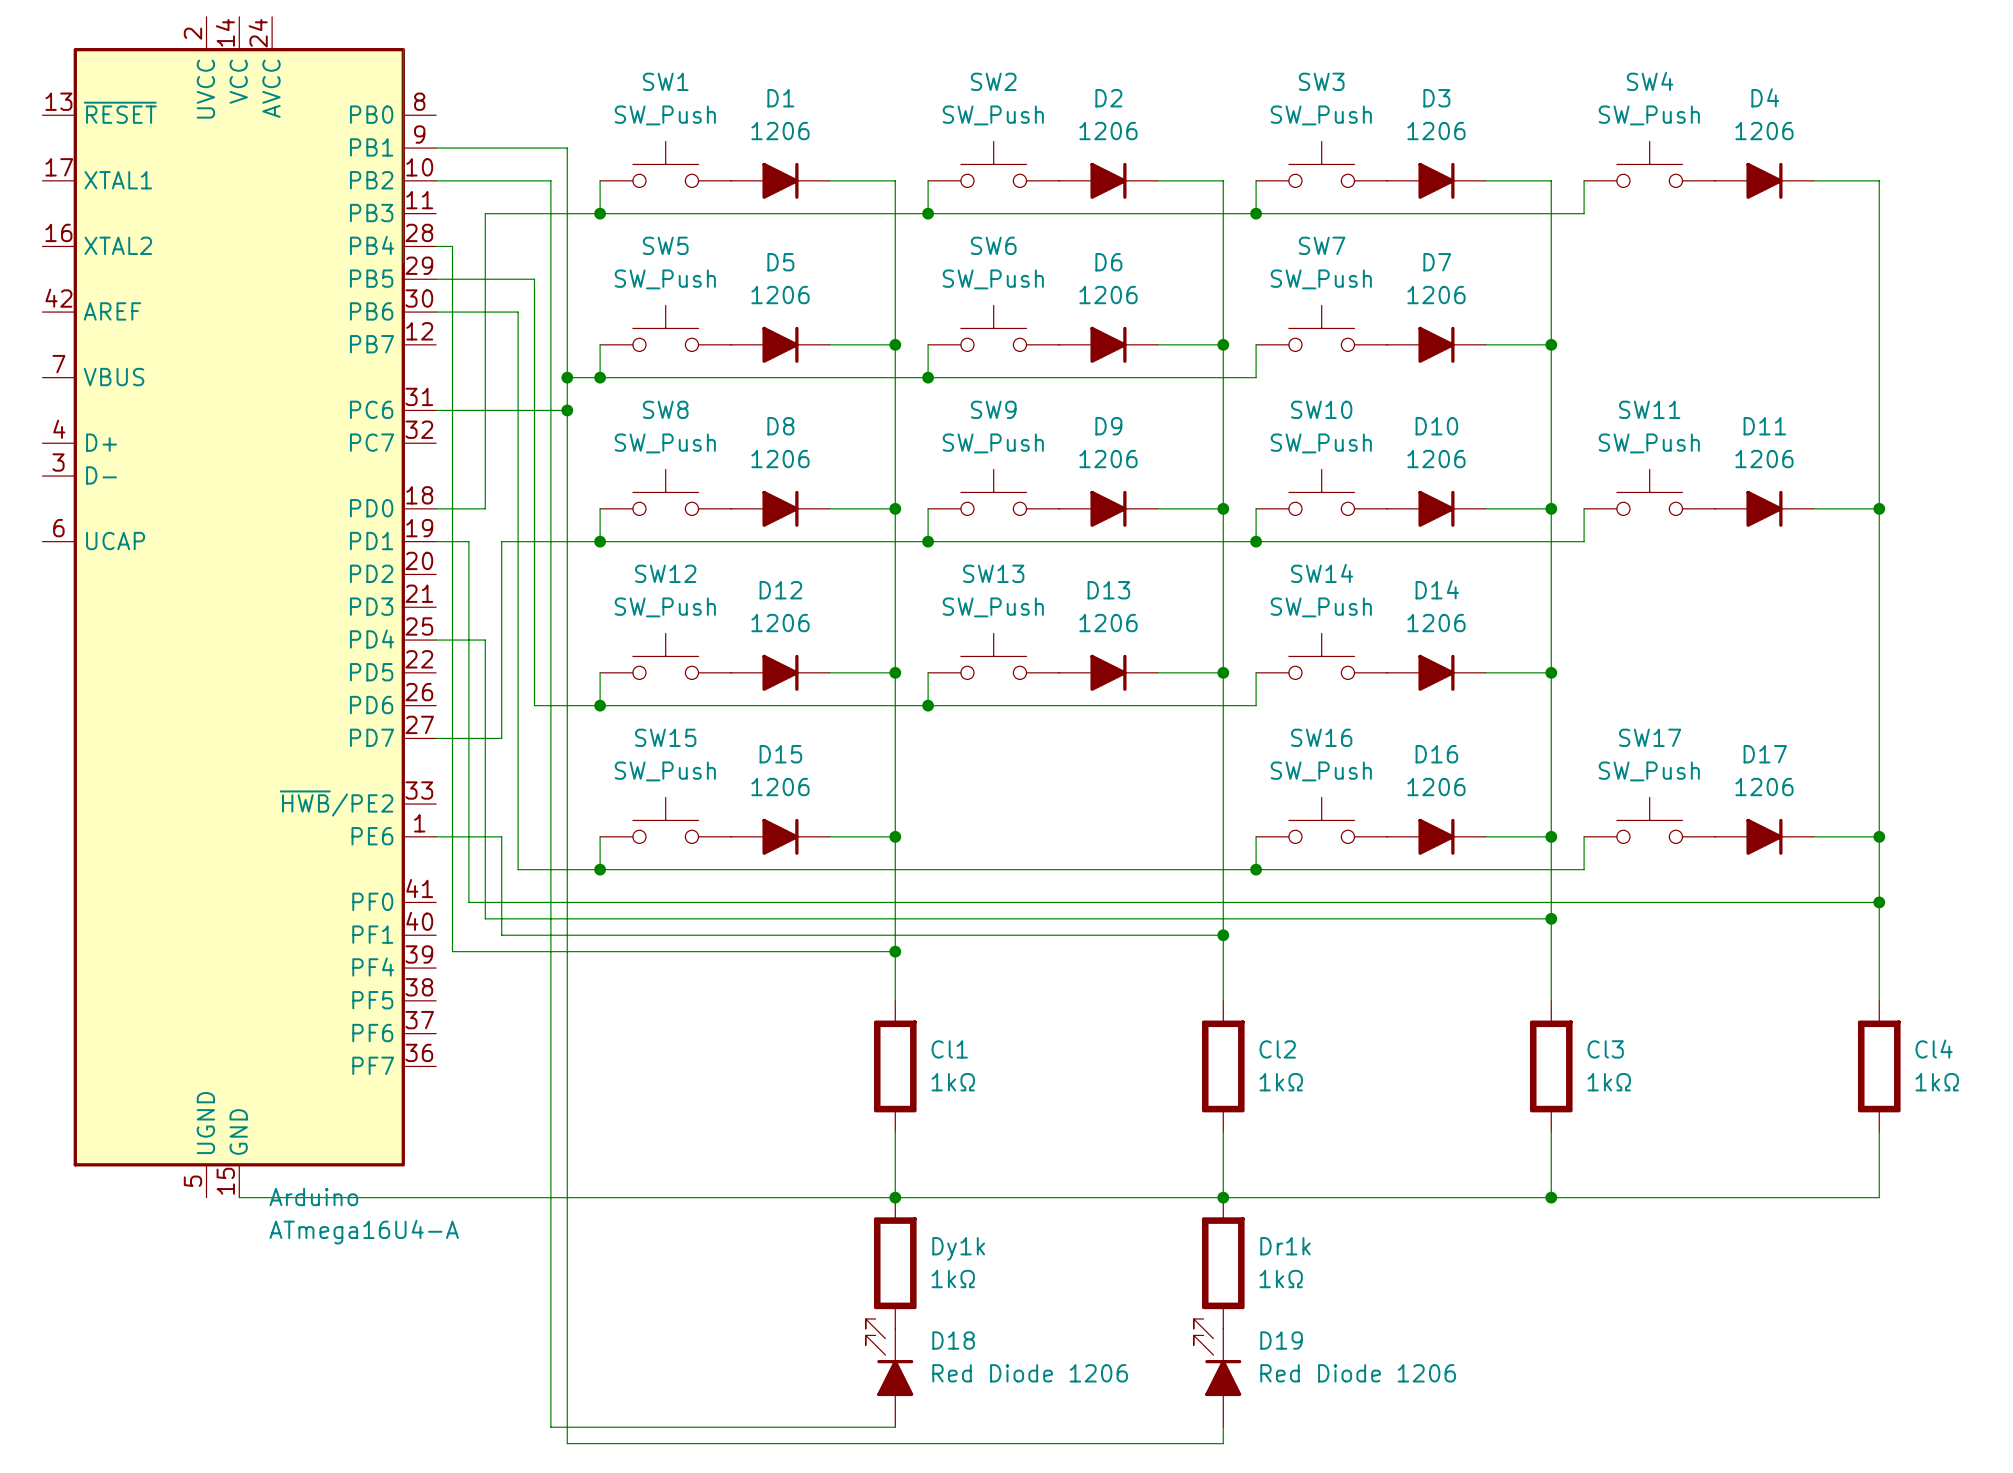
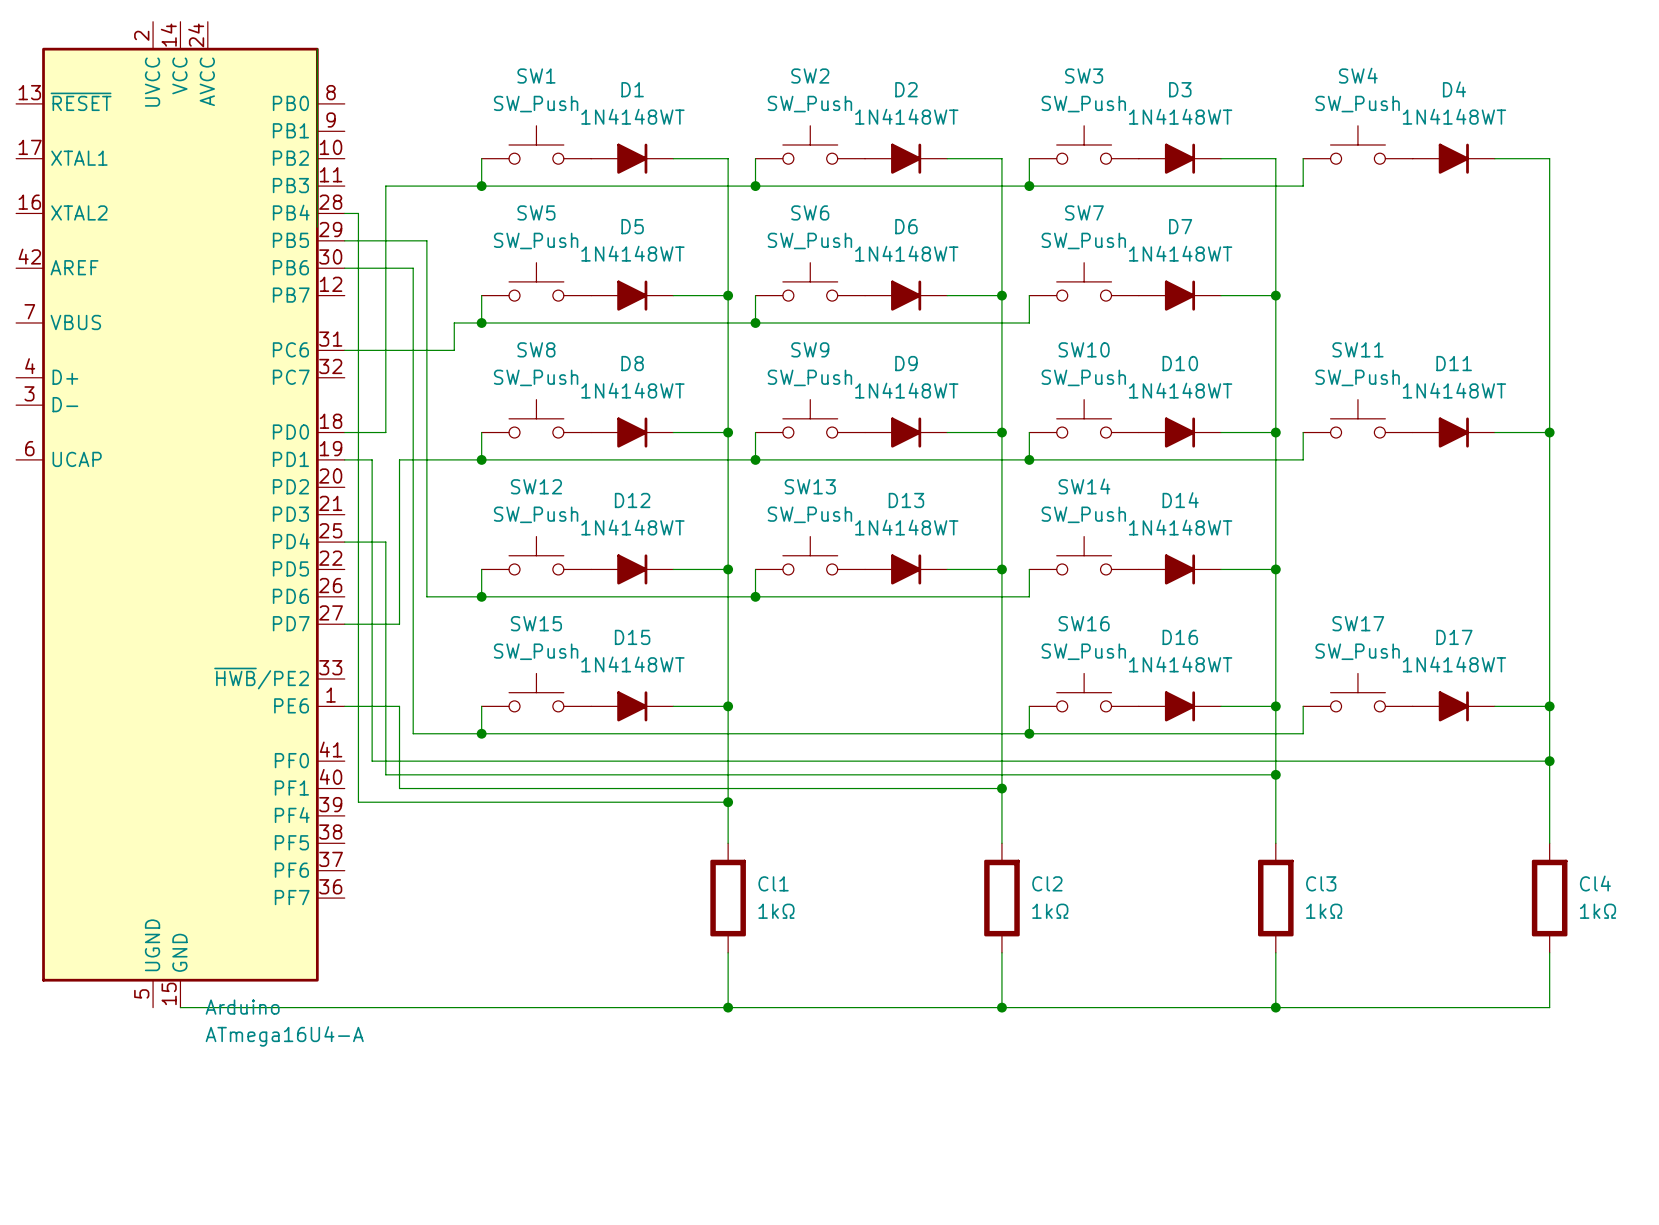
D1 value: 1206 (780, 131) -> 1N4148WT (632, 116)
D2 value: 1206 (1108, 131) -> 1N4148WT (906, 116)
D3 value: 1206 (1436, 131) -> 1N4148WT (1180, 116)
D4 value: 1206 (1764, 131) -> 1N4148WT (1454, 116)
wire: (436, 148) (567, 148) (567, 377) -> none
wire: (436, 180) (550, 180) (550, 1427) (895, 1427) -> none
D5 value: 1206 (780, 295) -> 1N4148WT (632, 253)
D6 value: 1206 (1108, 295) -> 1N4148WT (906, 253)
D7 value: 1206 (1436, 295) -> 1N4148WT (1180, 253)
junction: (567, 377) -> none
wire: (567, 410) (567, 1443) (1223, 1443) (1223, 1427) -> none
junction: (567, 410) -> none
D8 value: 1206 (780, 459) -> 1N4148WT (632, 390)
D9 value: 1206 (1108, 459) -> 1N4148WT (906, 390)
D10 value: 1206 (1436, 459) -> 1N4148WT (1180, 390)
D11 value: 1206 (1764, 459) -> 1N4148WT (1454, 390)
D12 value: 1206 (780, 623) -> 1N4148WT (632, 527)
D13 value: 1206 (1108, 623) -> 1N4148WT (906, 527)
D14 value: 1206 (1436, 623) -> 1N4148WT (1180, 527)
D15 value: 1206 (780, 787) -> 1N4148WT (632, 664)
D16 value: 1206 (1436, 787) -> 1N4148WT (1180, 664)
D17 value: 1206 (1764, 787) -> 1N4148WT (1454, 664)
Dy1k: 1kΩ (895, 1263) -> none
Dr1k: 1kΩ (1223, 1263) -> none
D18: Red Diode 1206 (889, 1373) -> none
D19: Red Diode 1206 (1217, 1373) -> none

